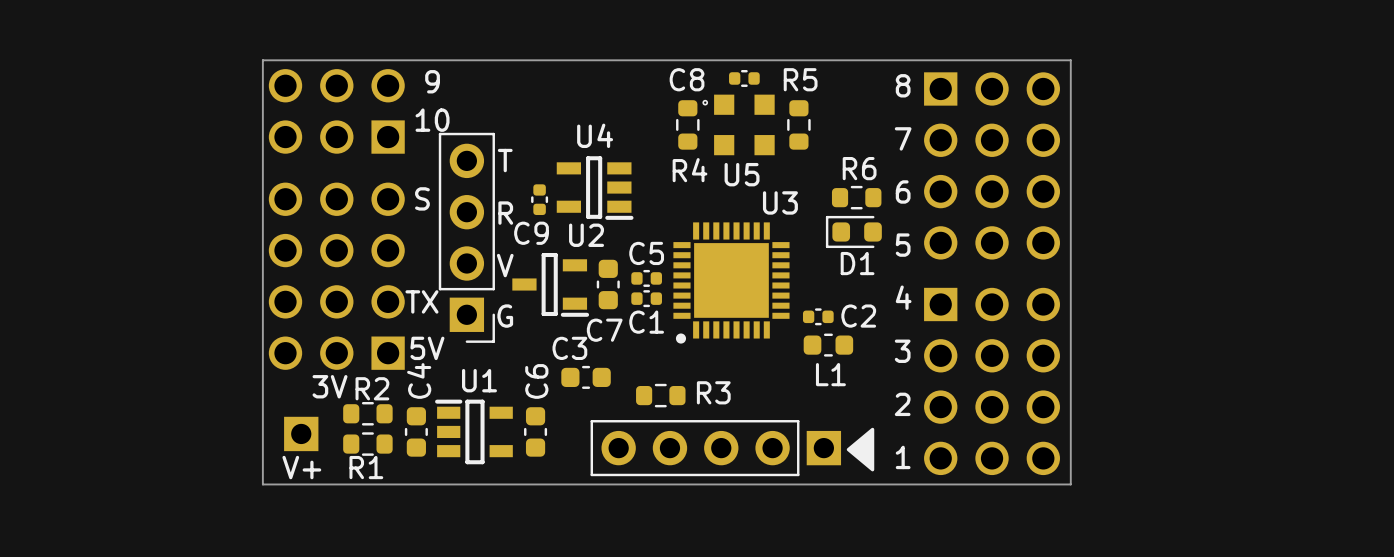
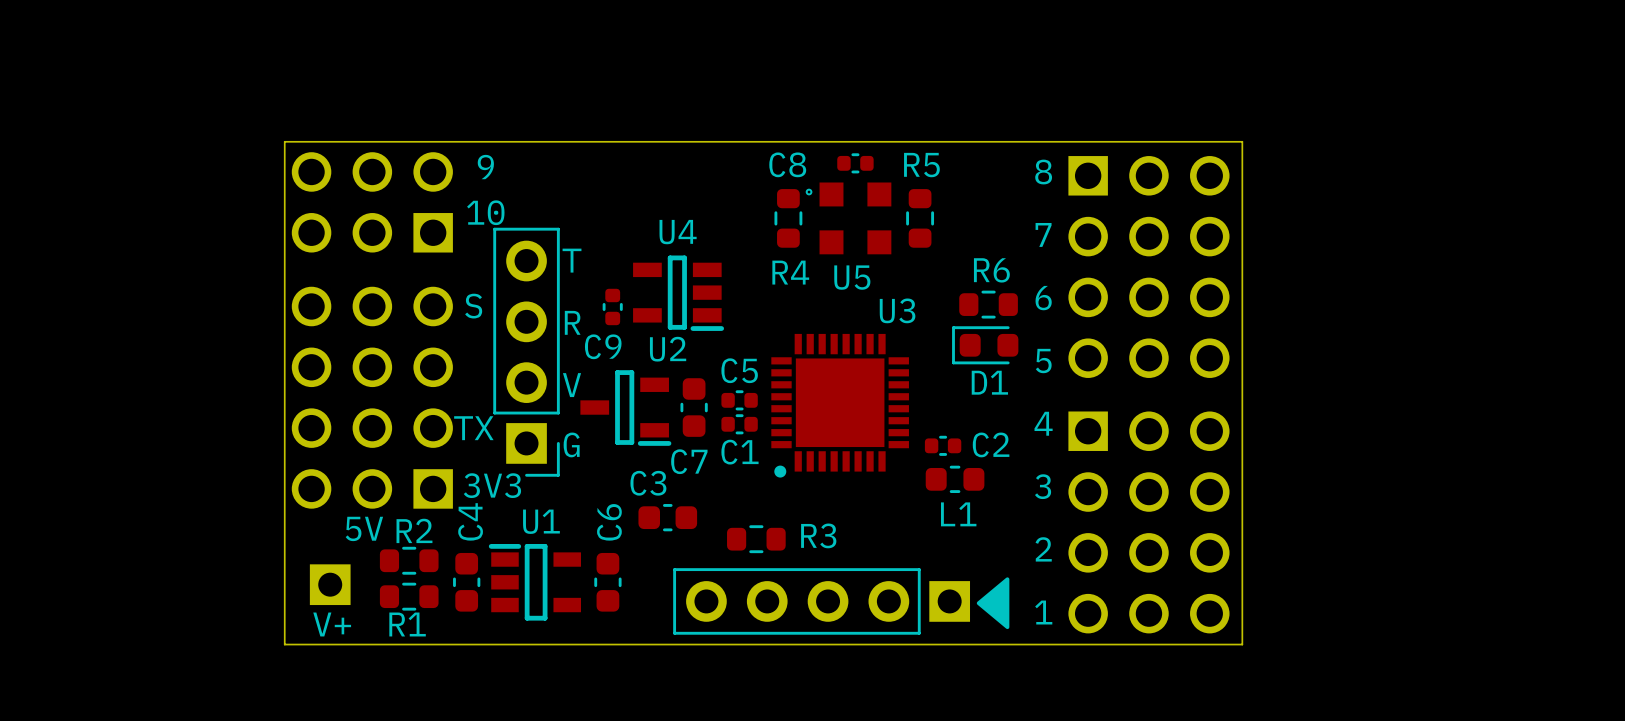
text: 5V (427, 348) -> 3V3 (492, 485)
text: 3V (330, 386) -> 5V (364, 528)

